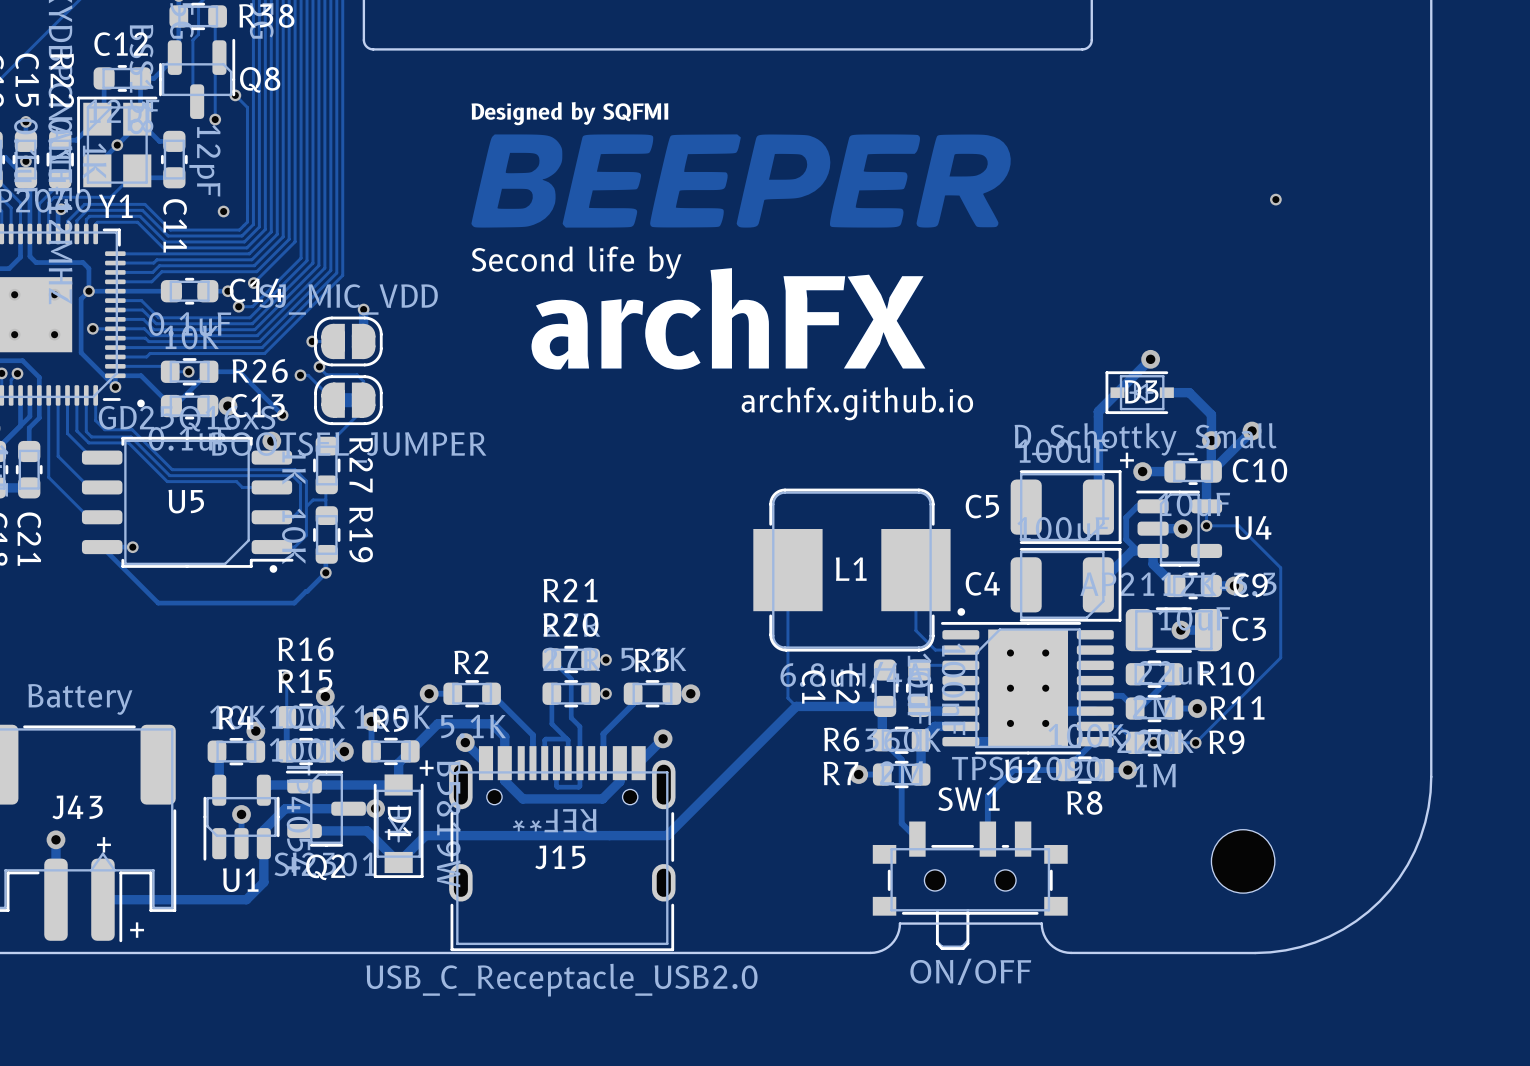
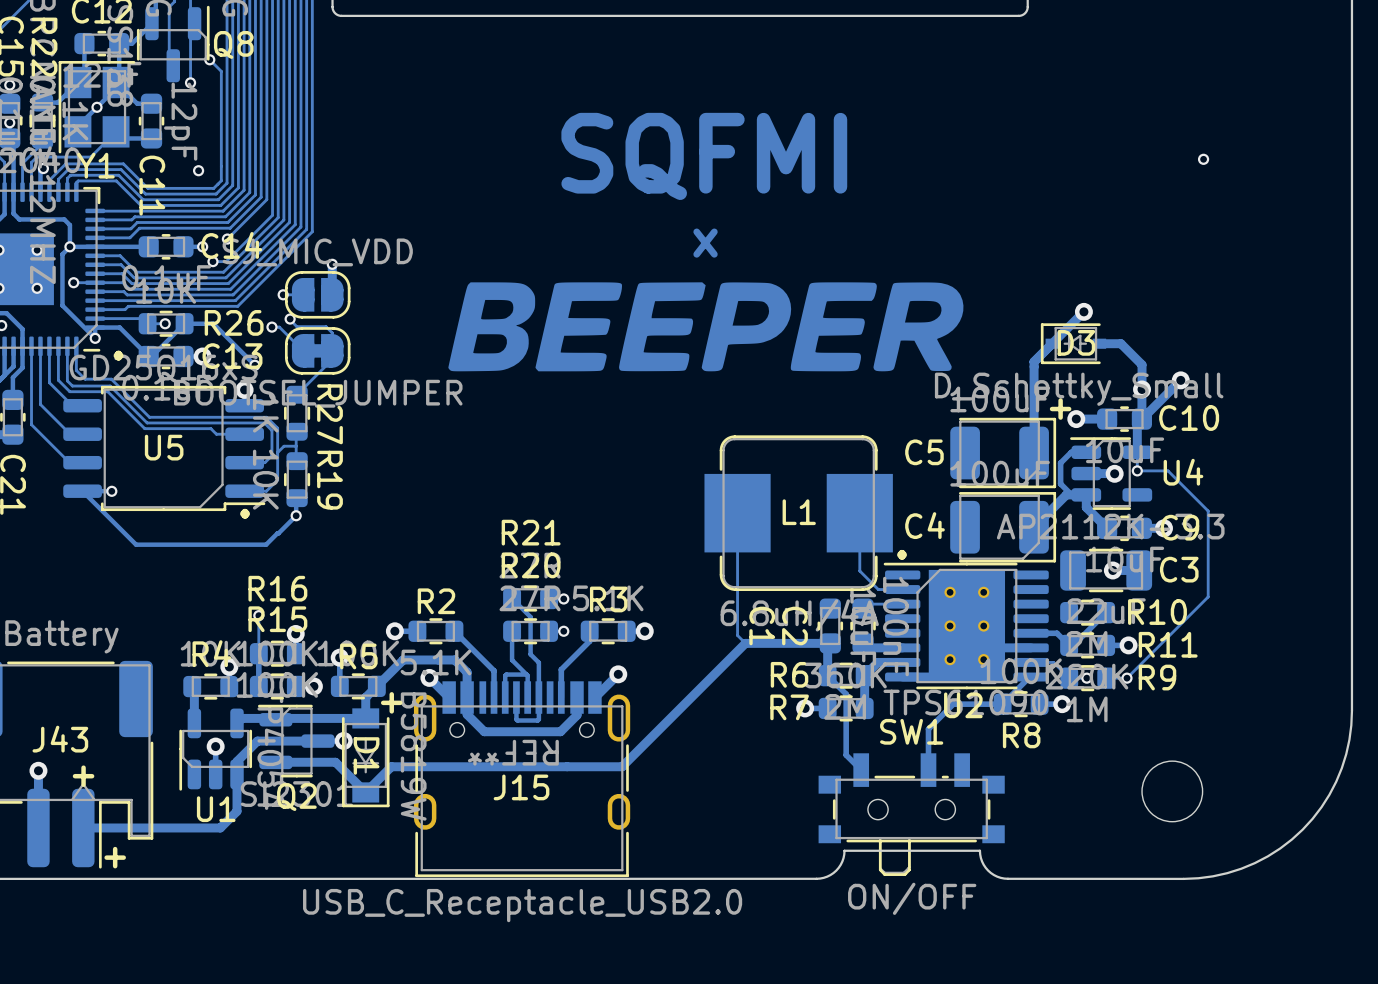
text: Designed by SQFMI (569, 113) -> none
drawing position: (741, 180) -> (705, 326)
text: none -> SQFMI (704, 156)
text: Second life by (576, 262) -> none
text: none -> x (705, 243)
text: archFX (728, 318) -> none
text: archfx.github.io (857, 403) -> none

